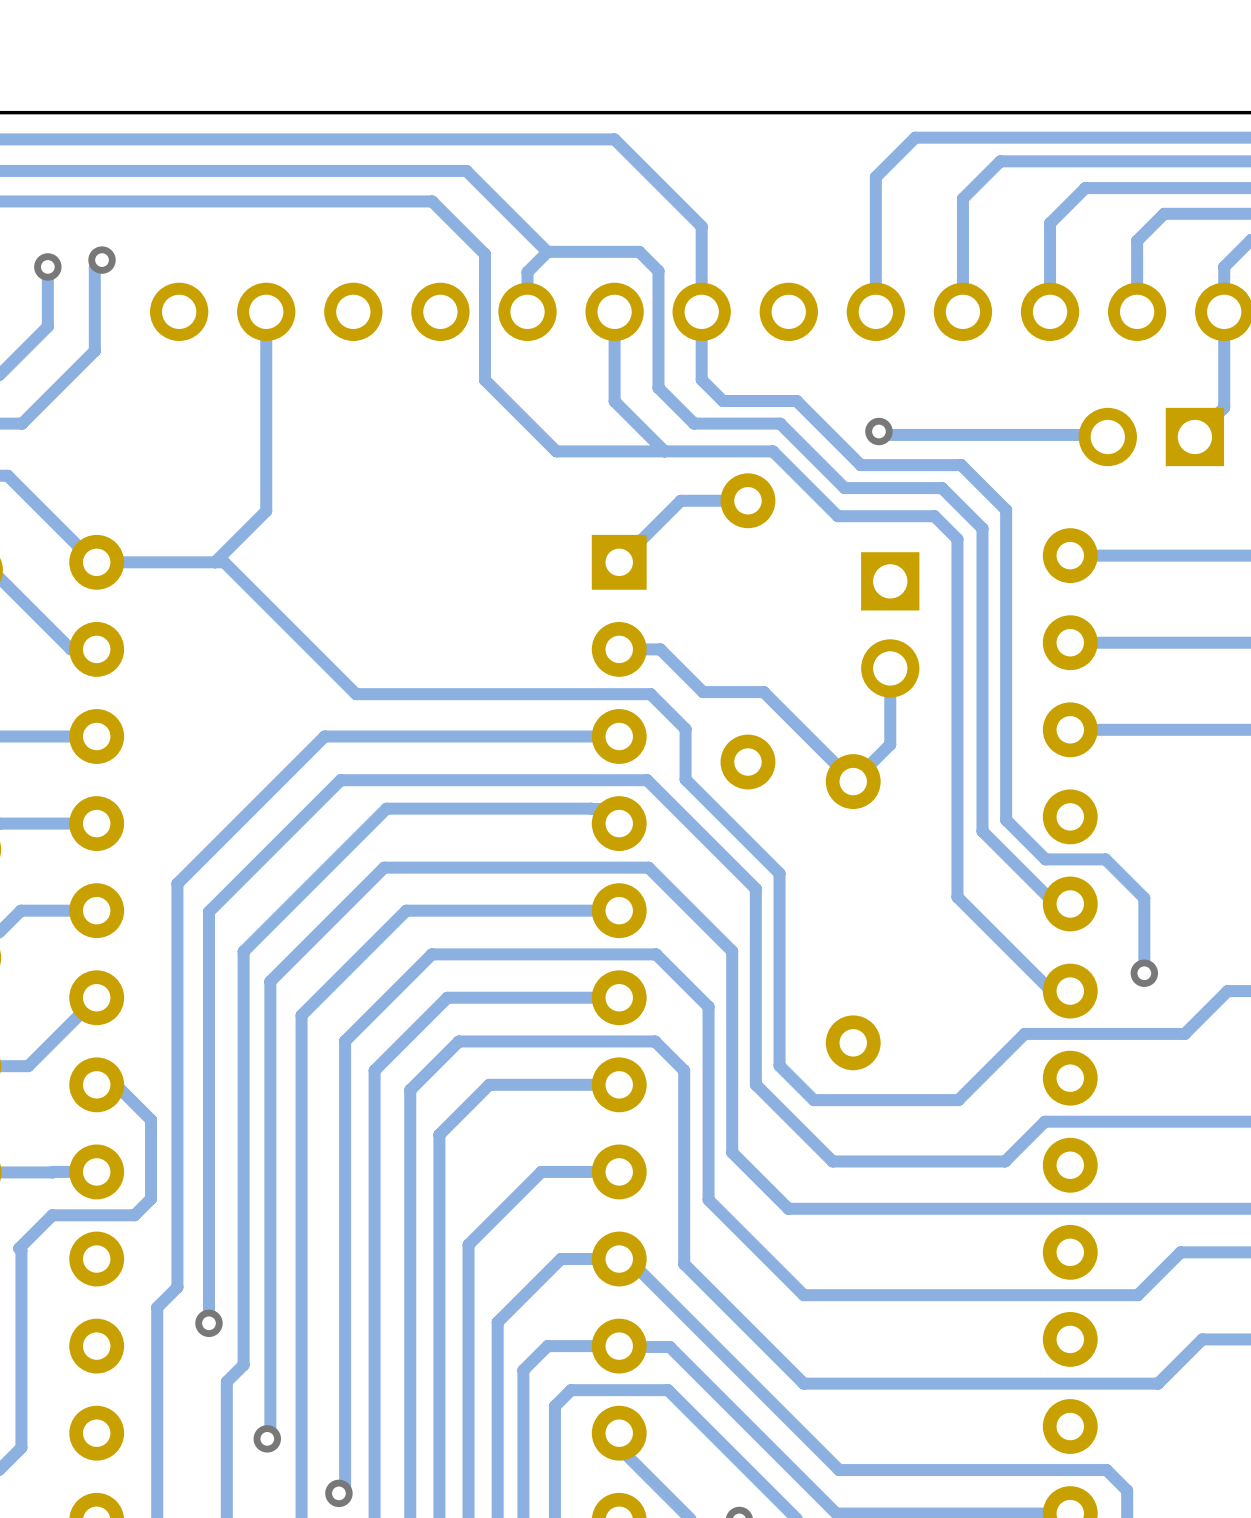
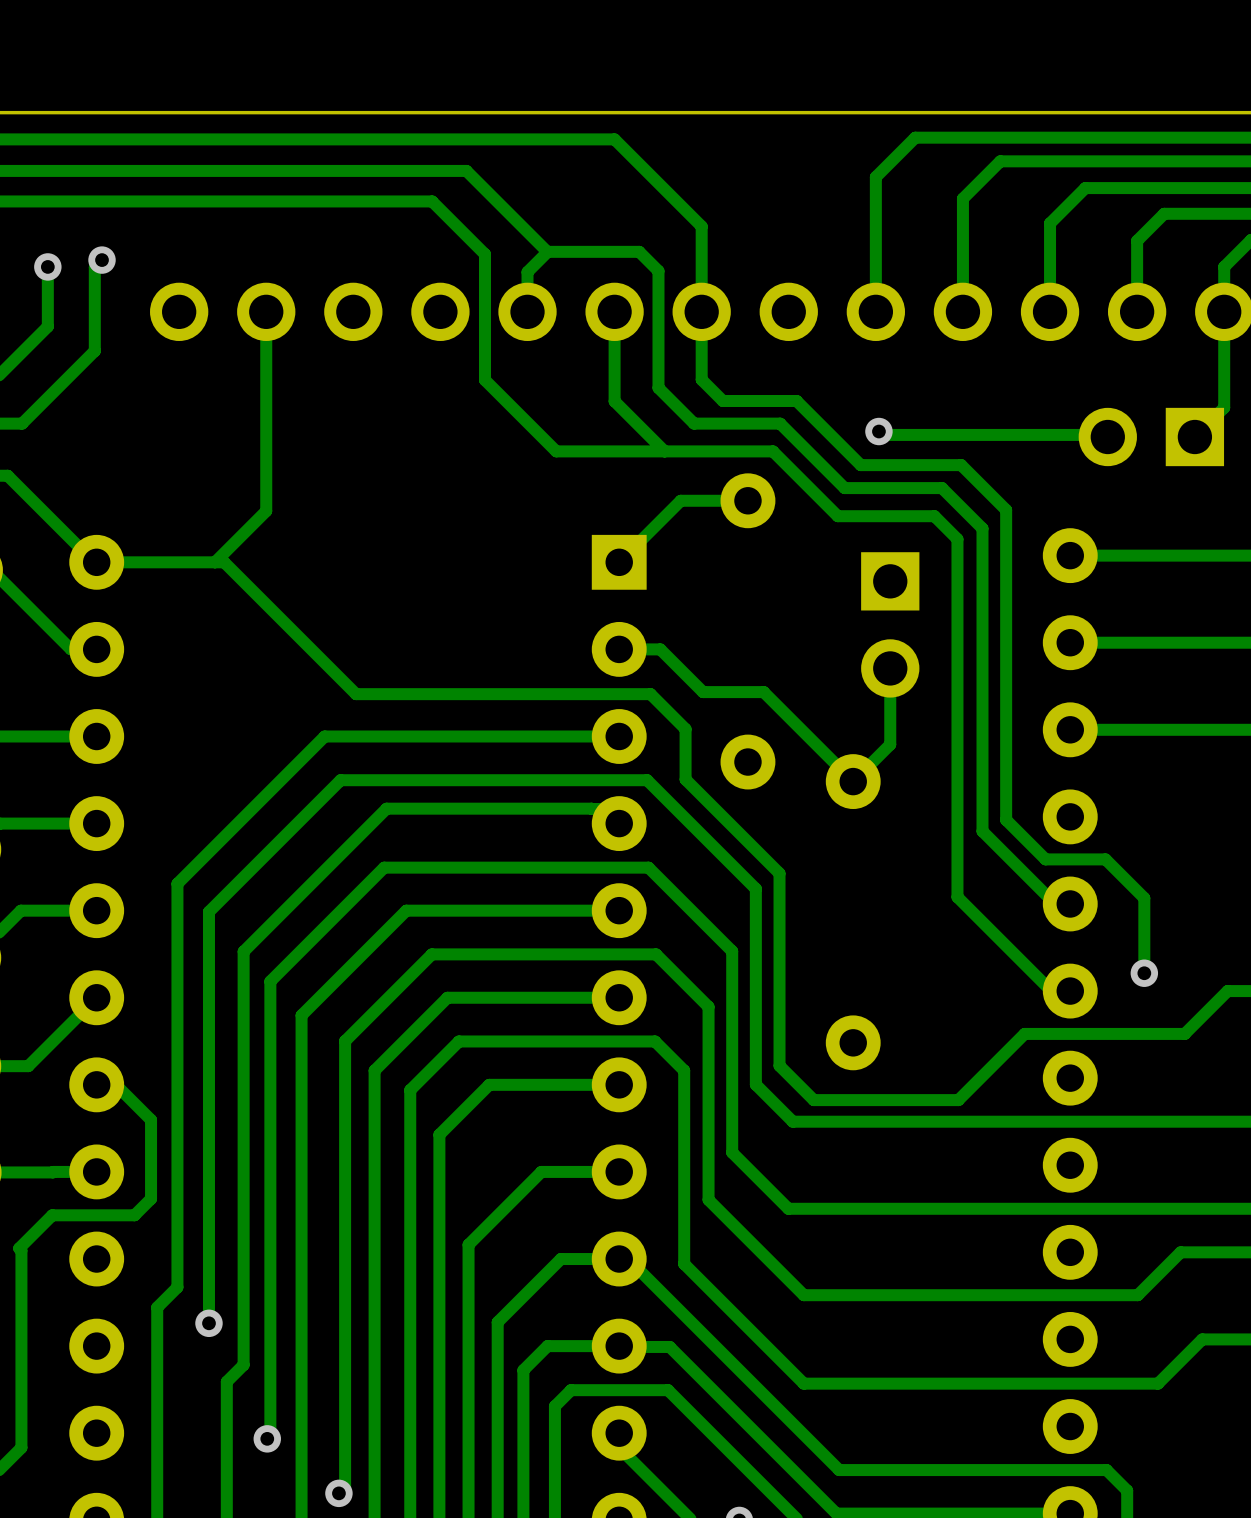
track: (1044, 1121) (1005, 1161) (832, 1161) (792, 1121) -> (1044, 1121) (792, 1121)

